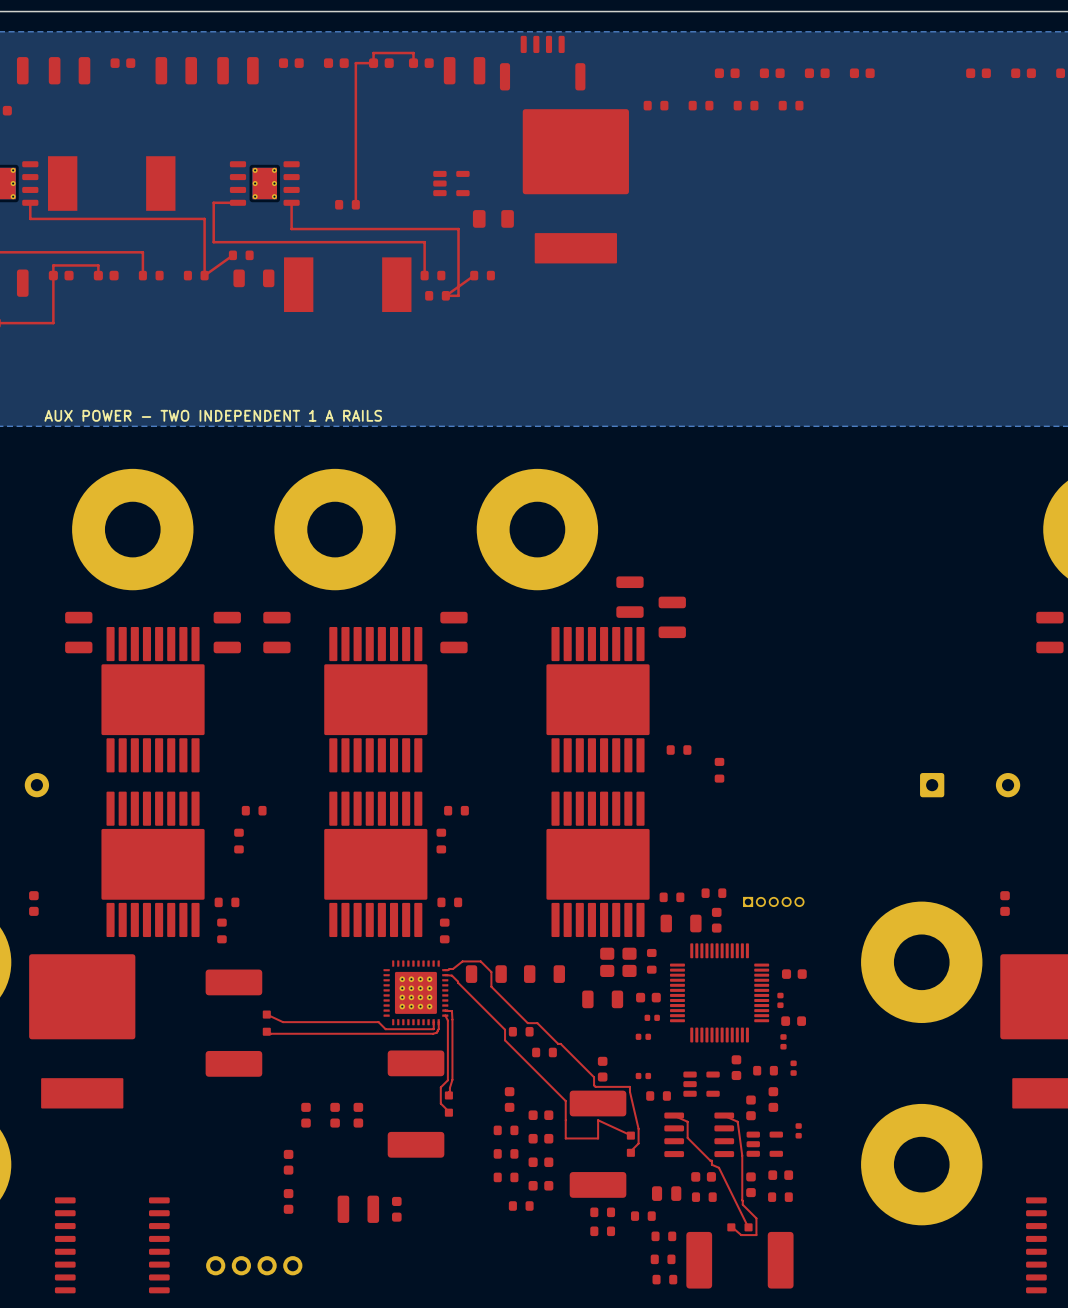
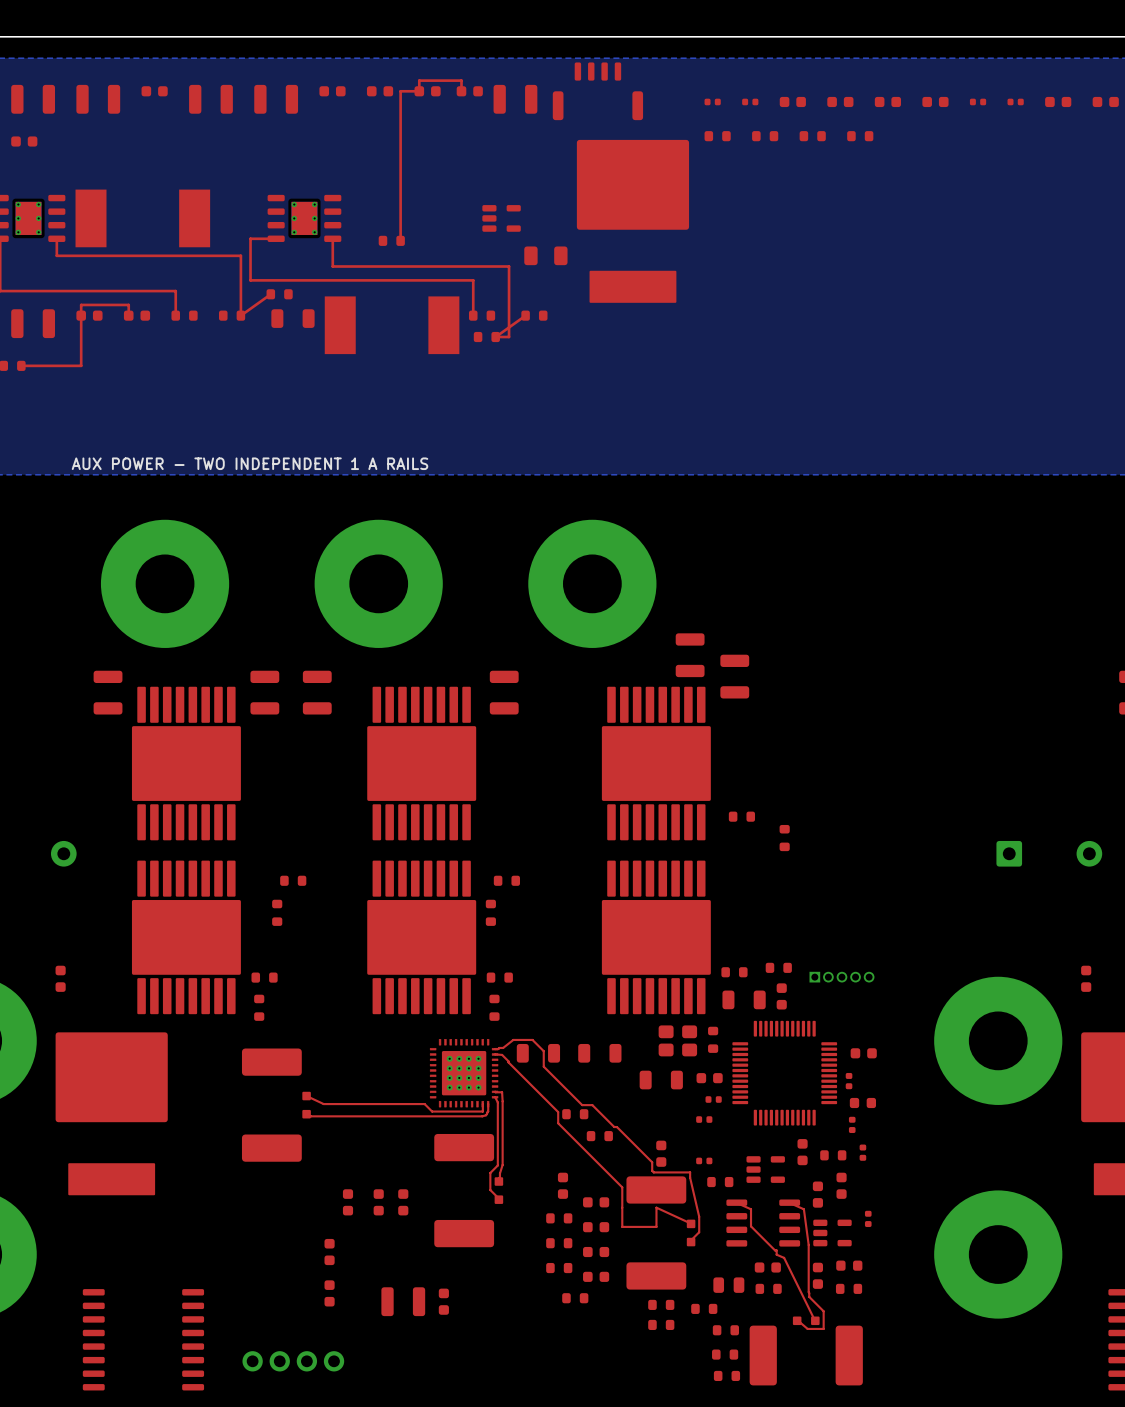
part: none -> (712, 101)
part: none -> (750, 101)
part: none -> (978, 101)
part: none -> (1015, 101)

